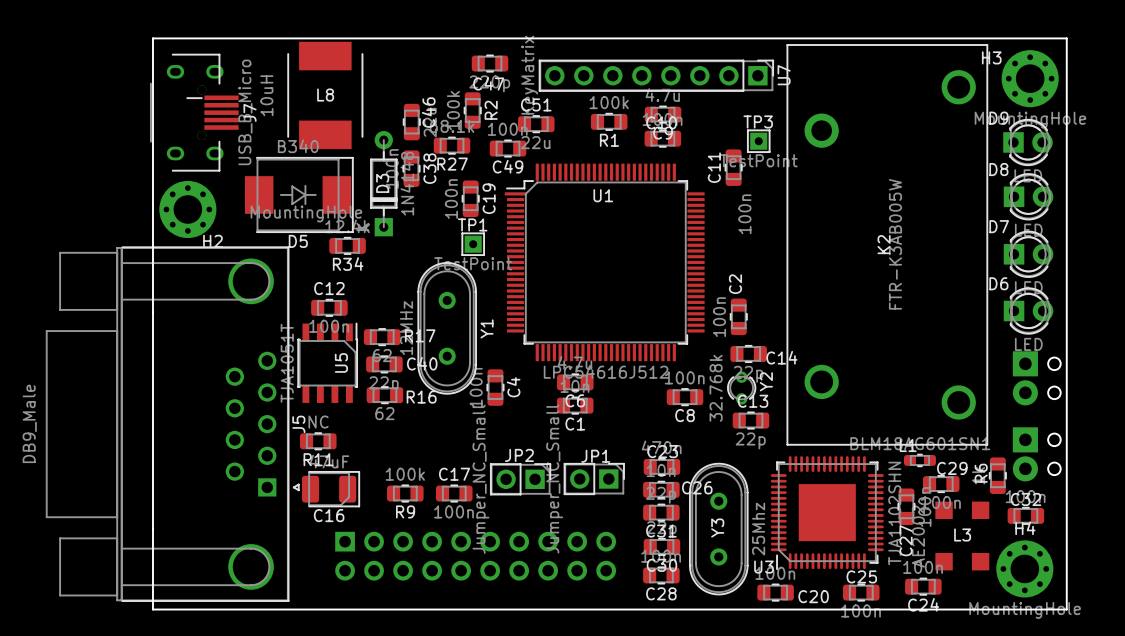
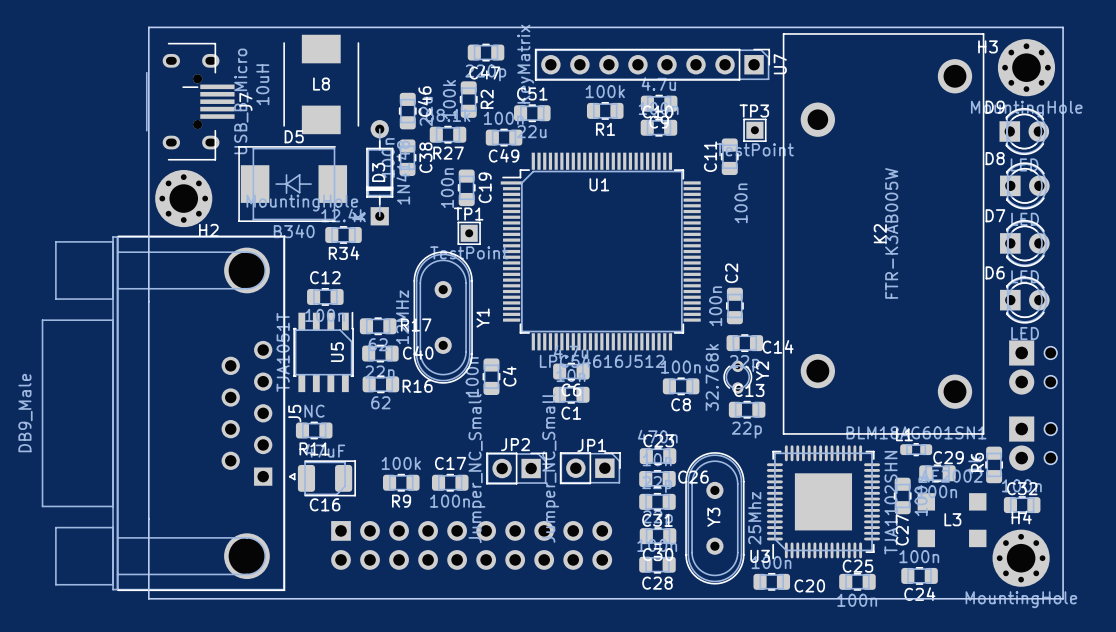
L8 footprint: [287, 41, 364, 150] -> [283, 34, 360, 135]
D5 rotation: 0° (299, 194) -> 180° (292, 184)
L3 rotation: 0° (962, 535) -> 90° clockwise (952, 520)

